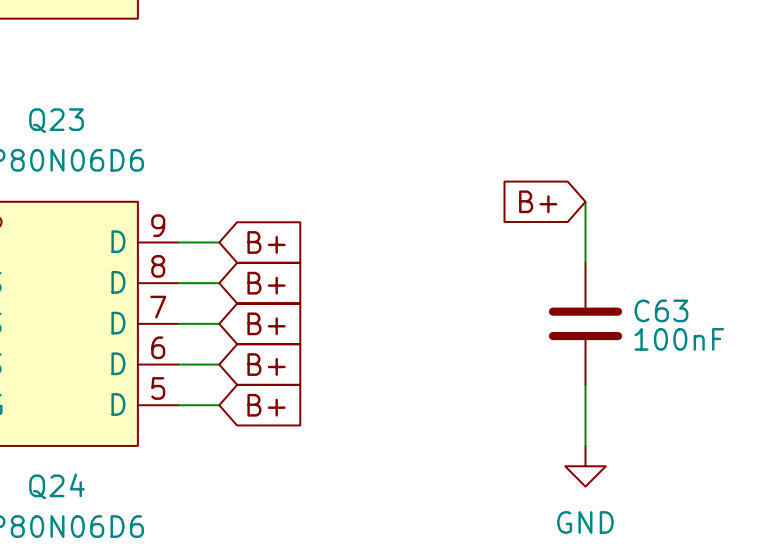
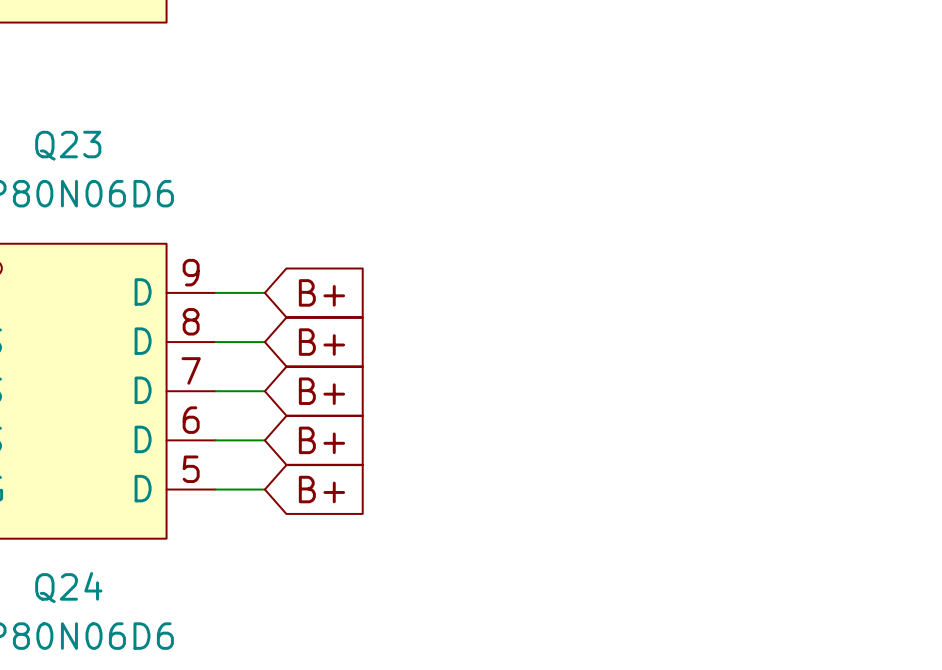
global label: B+ (538, 201) -> none
wire: (585, 201) (585, 262) -> none
C63: 100nF (585, 323) -> none
wire: (585, 384) (585, 445) -> none
power symbol: GND (585, 466) -> none

